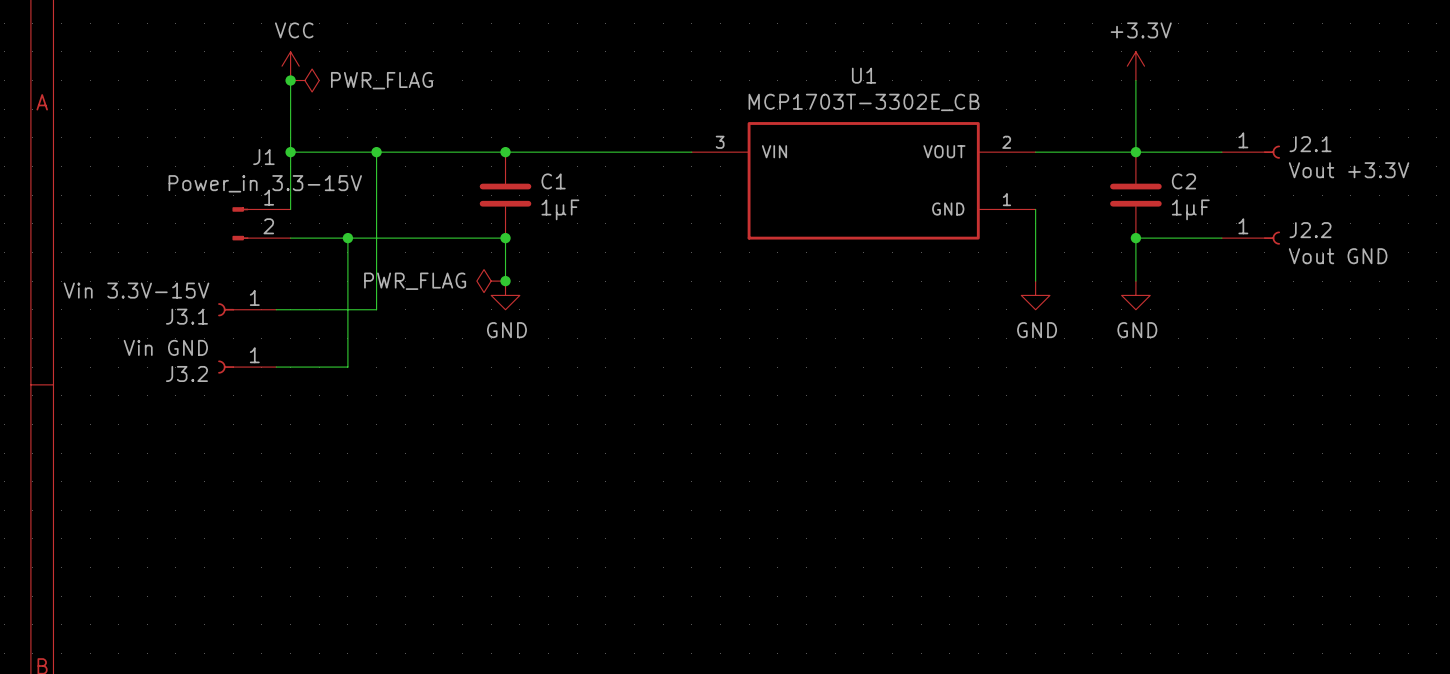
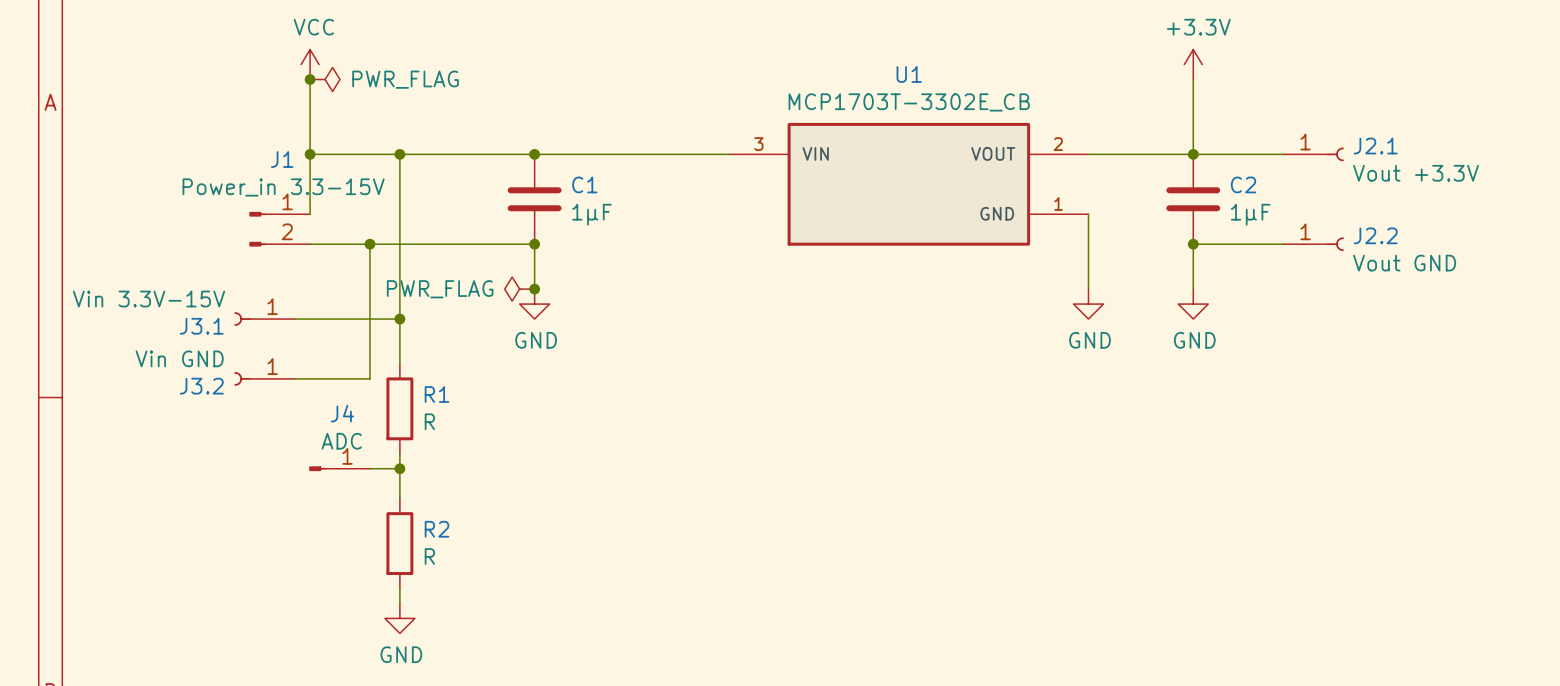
wire: none -> (399, 319) (399, 363)
junction: none -> (399, 319)
R1: none -> R (399, 408)
wire: none -> (399, 453) (399, 498)
J4: none -> ADC (339, 468)
wire: none -> (369, 468) (399, 468)
junction: none -> (399, 468)
R2: none -> R (399, 543)
wire: none -> (399, 588) (399, 603)
power symbol: none -> GND (399, 618)

